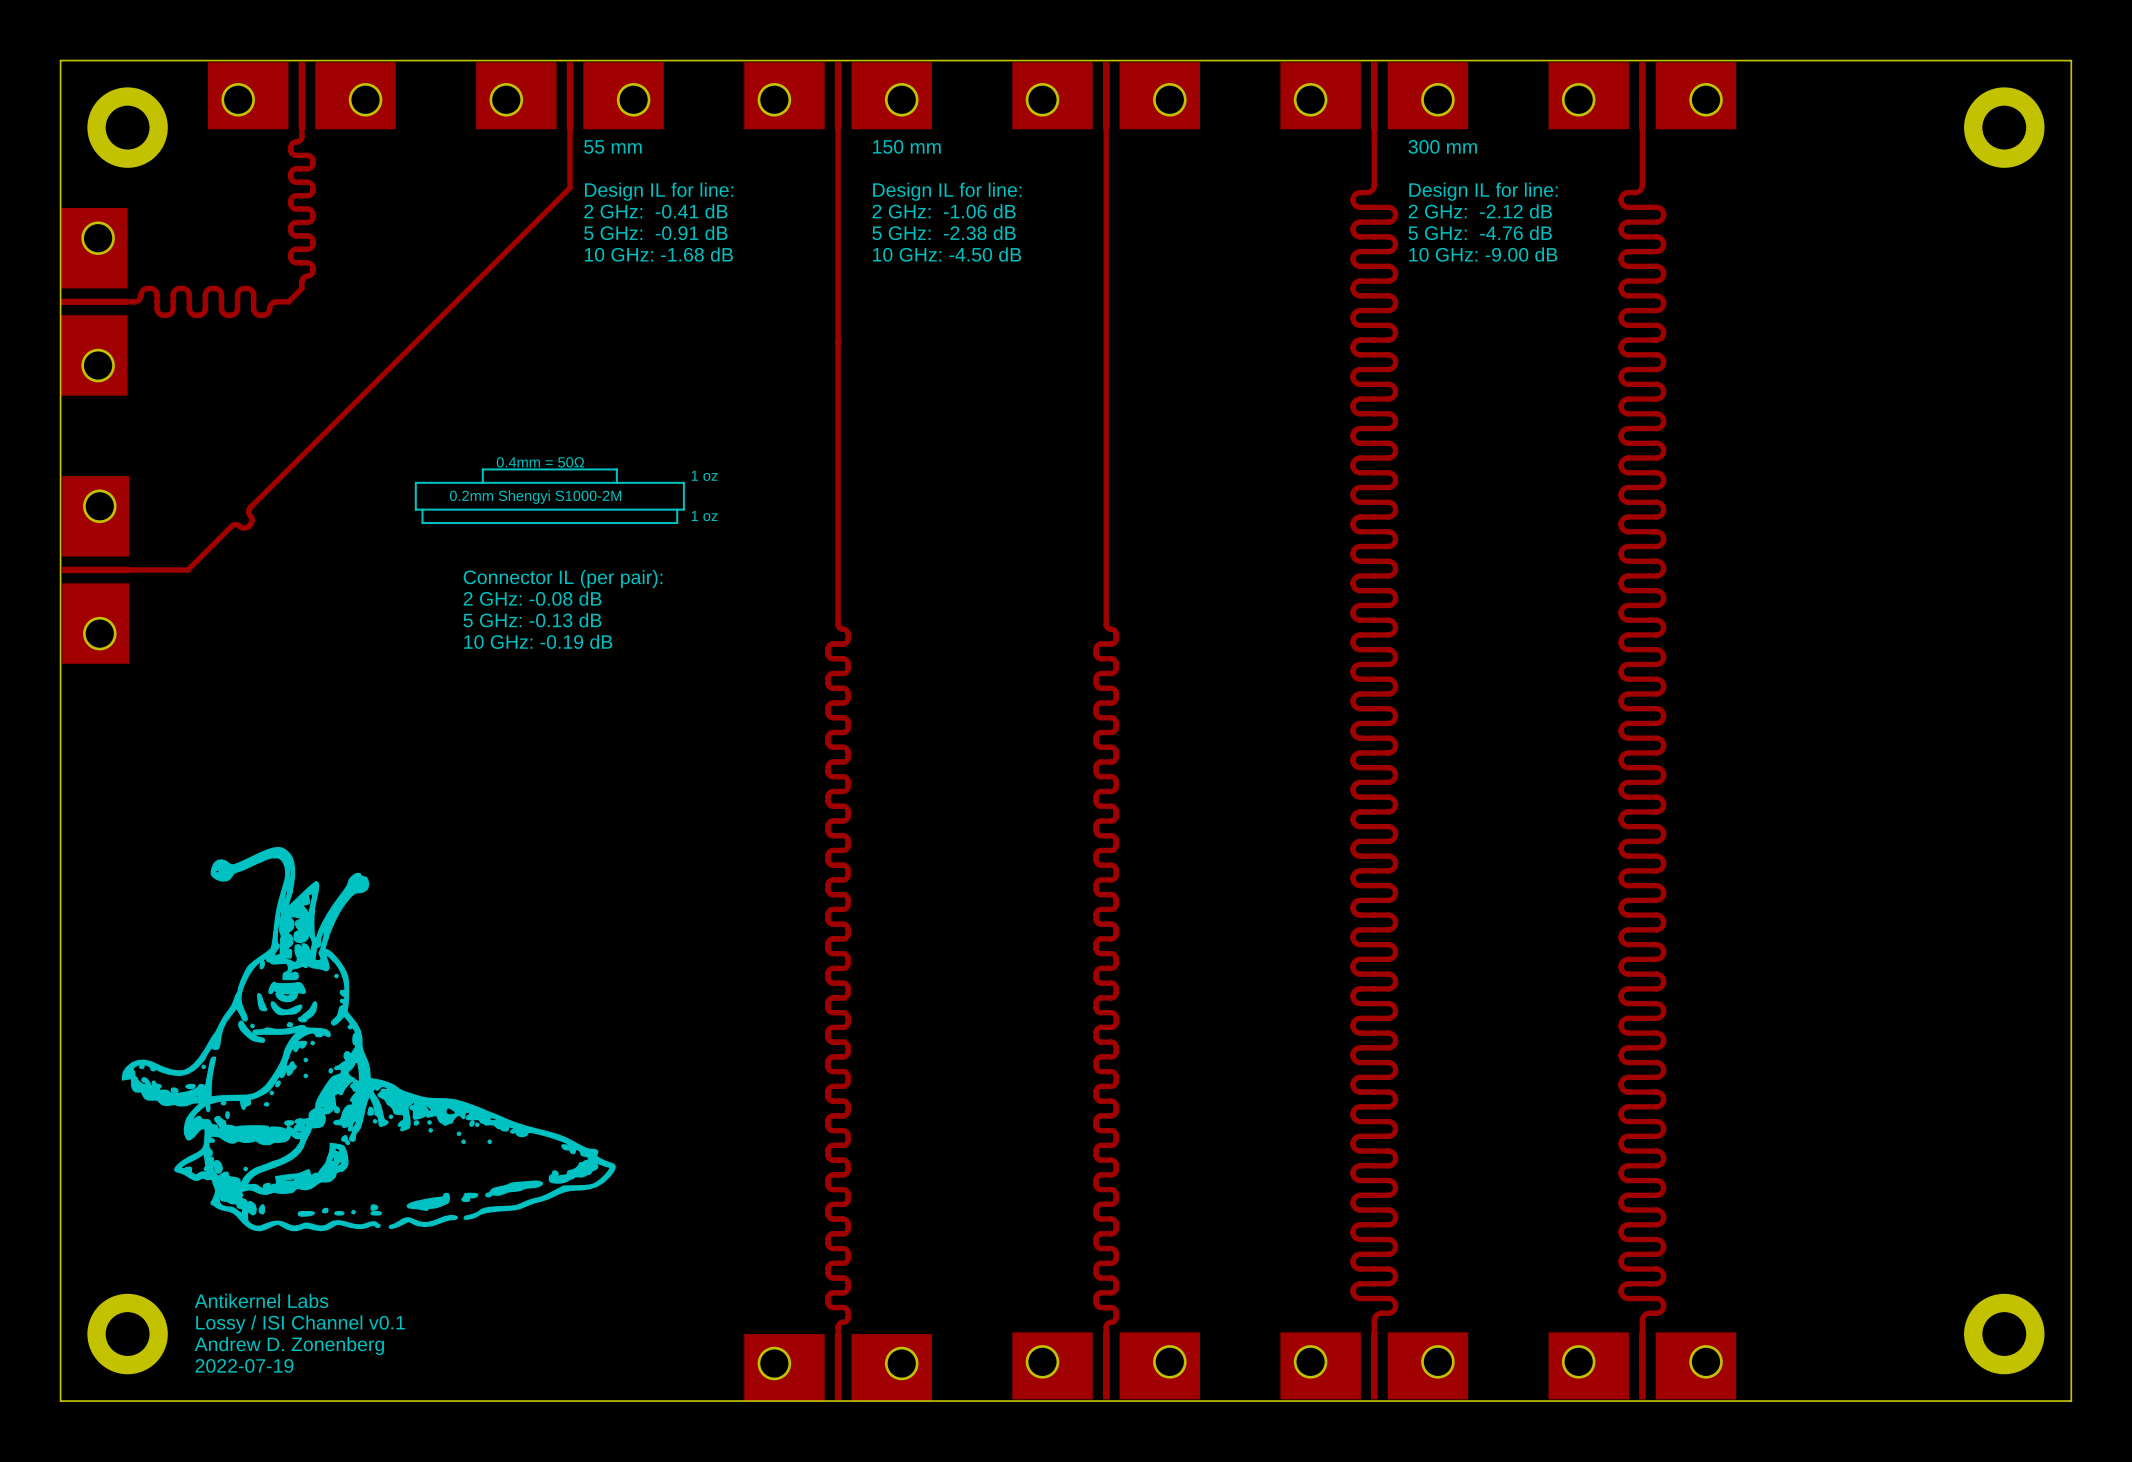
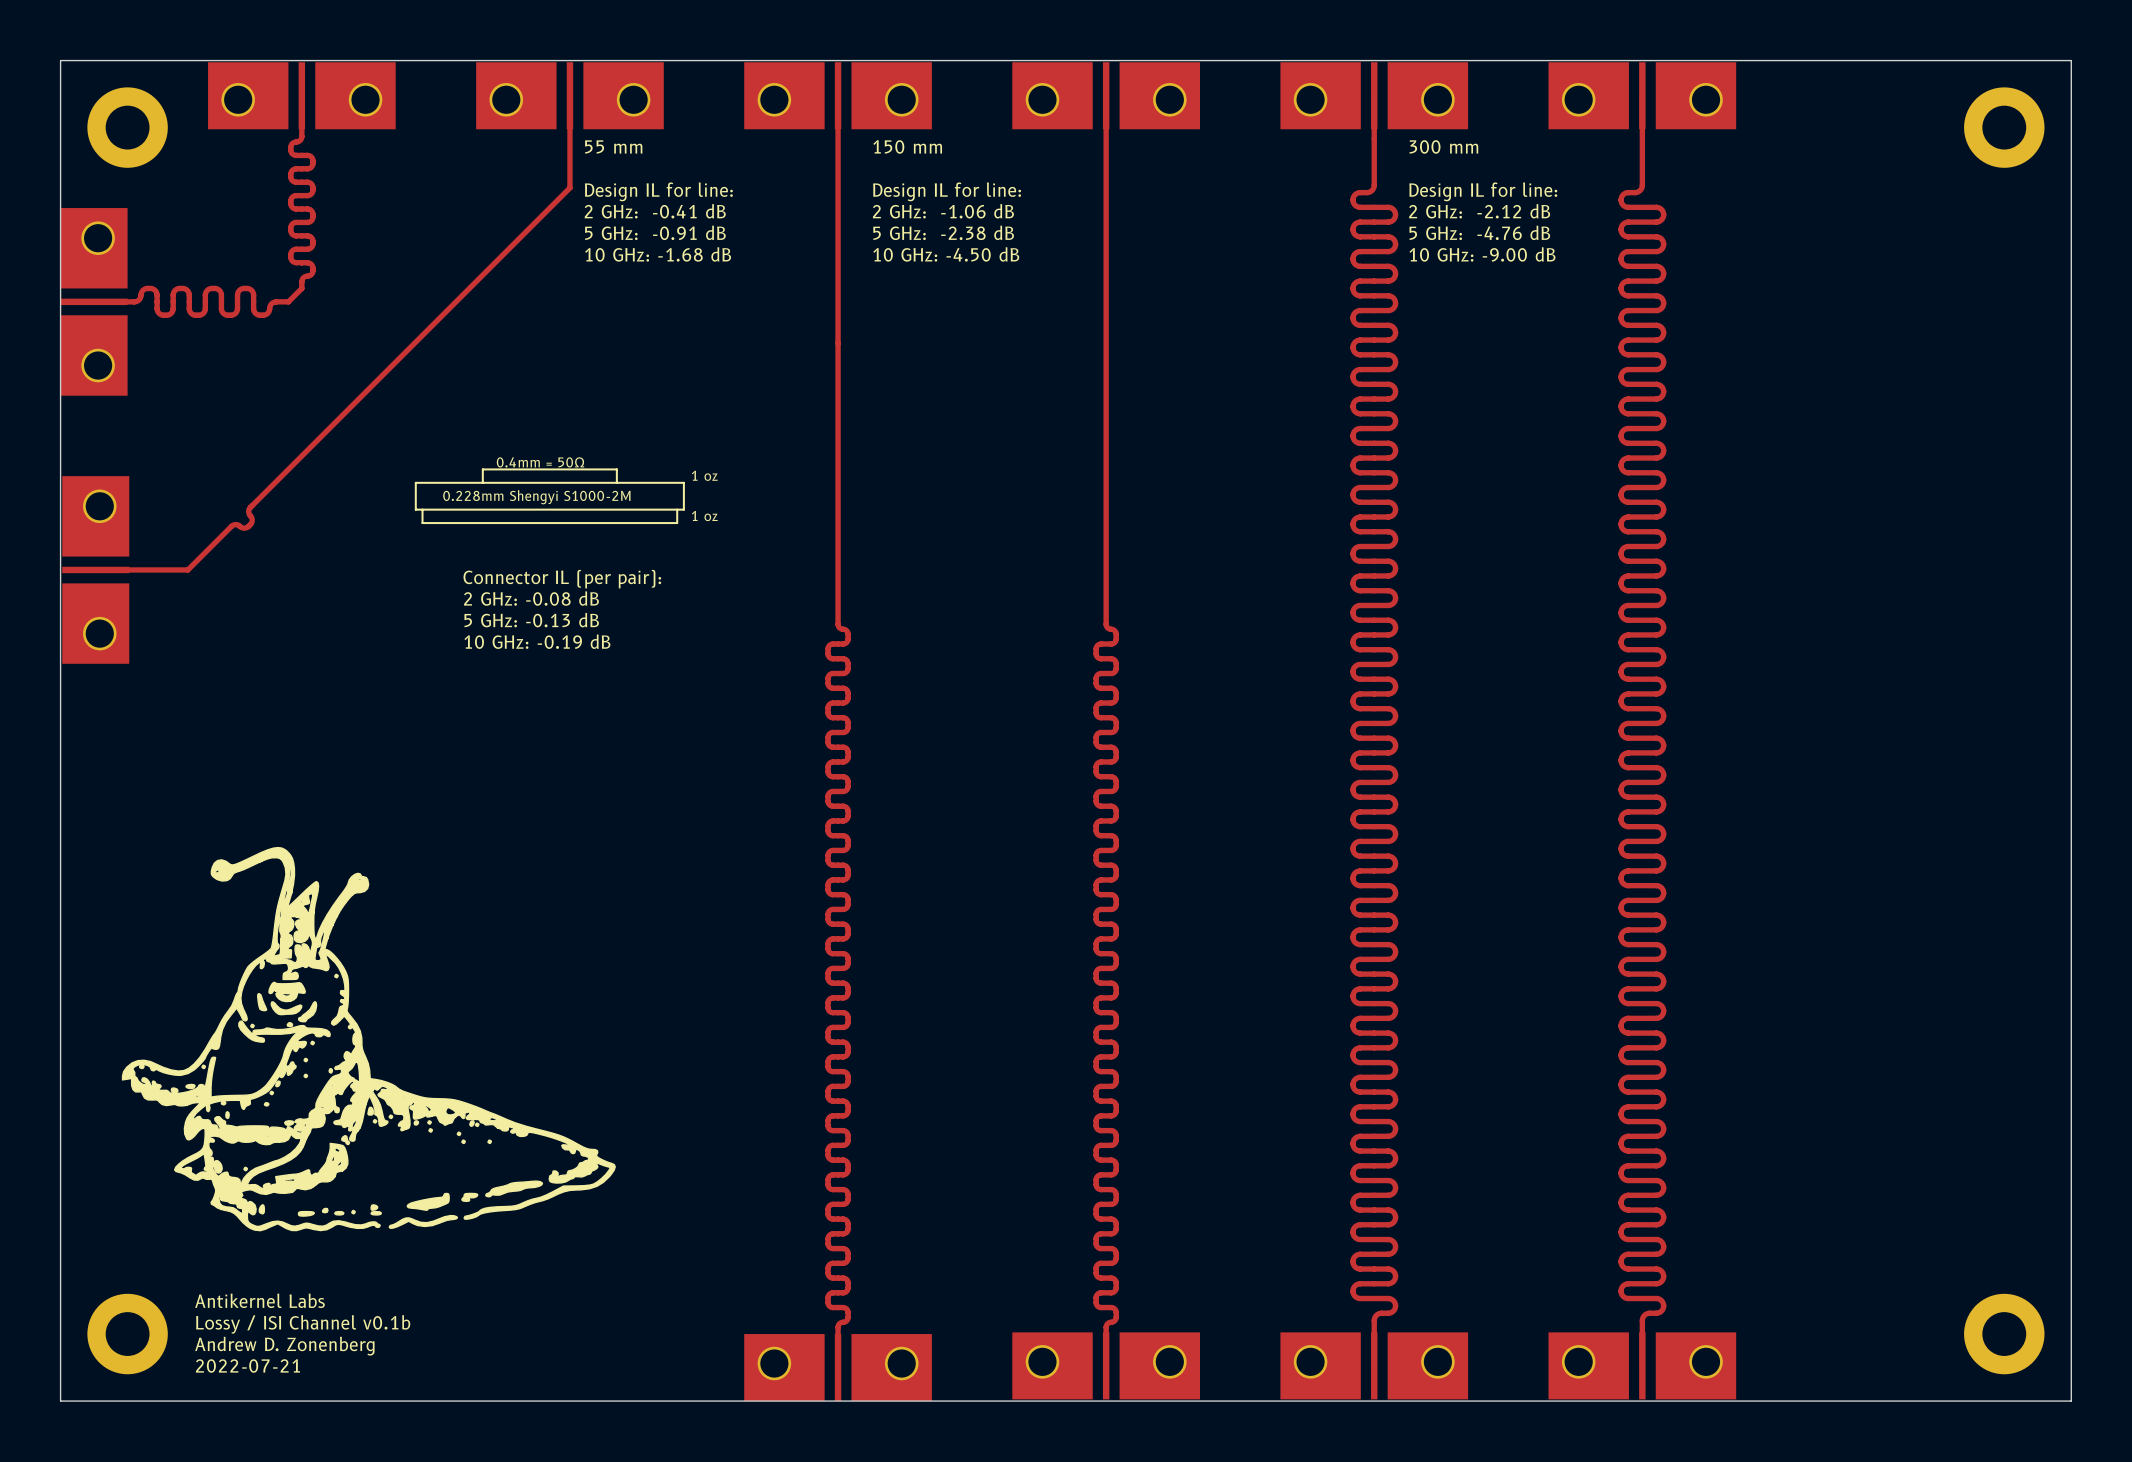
text: 0.2mm Shengyi S1000-2M (535, 497) -> 0.228mm Shengyi S1000-2M (536, 497)
text: Lossy / ISI Channel v0.1 (300, 1324) -> Lossy / ISI Channel v0.1b (303, 1324)
text: 2022-07-19 (244, 1365) -> 2022-07-21 (247, 1365)

